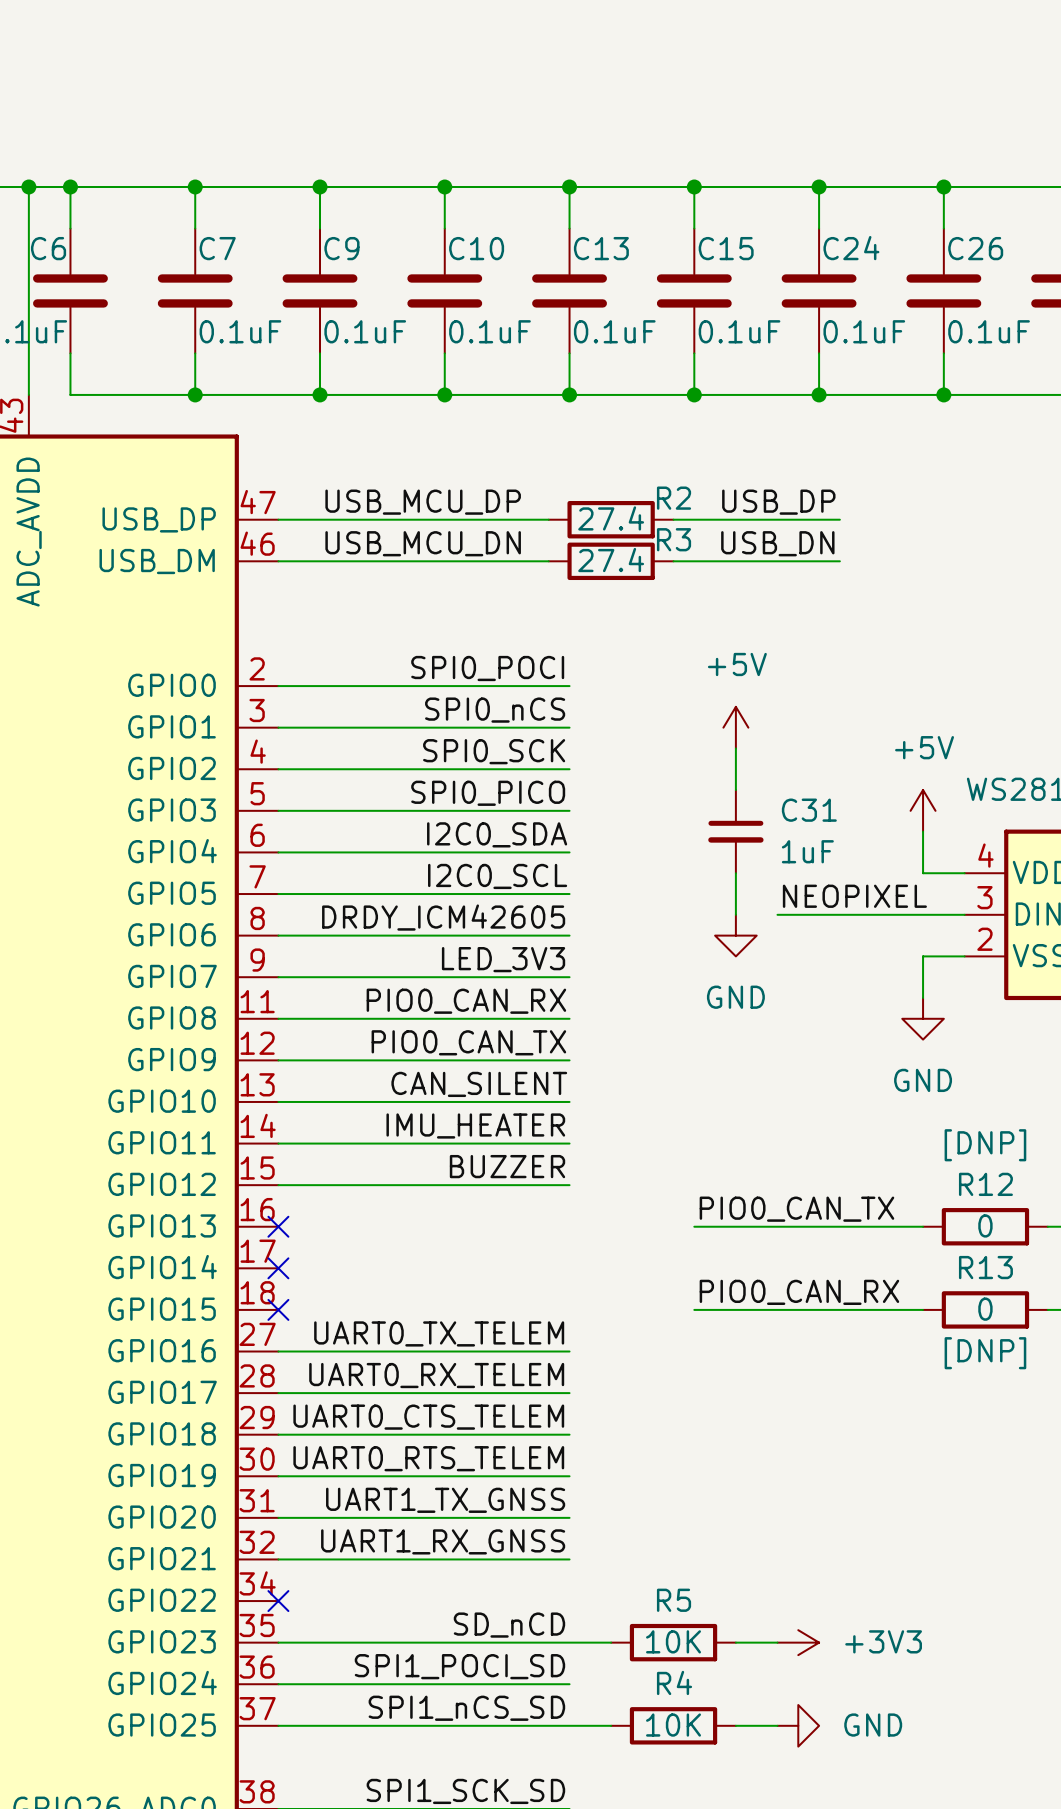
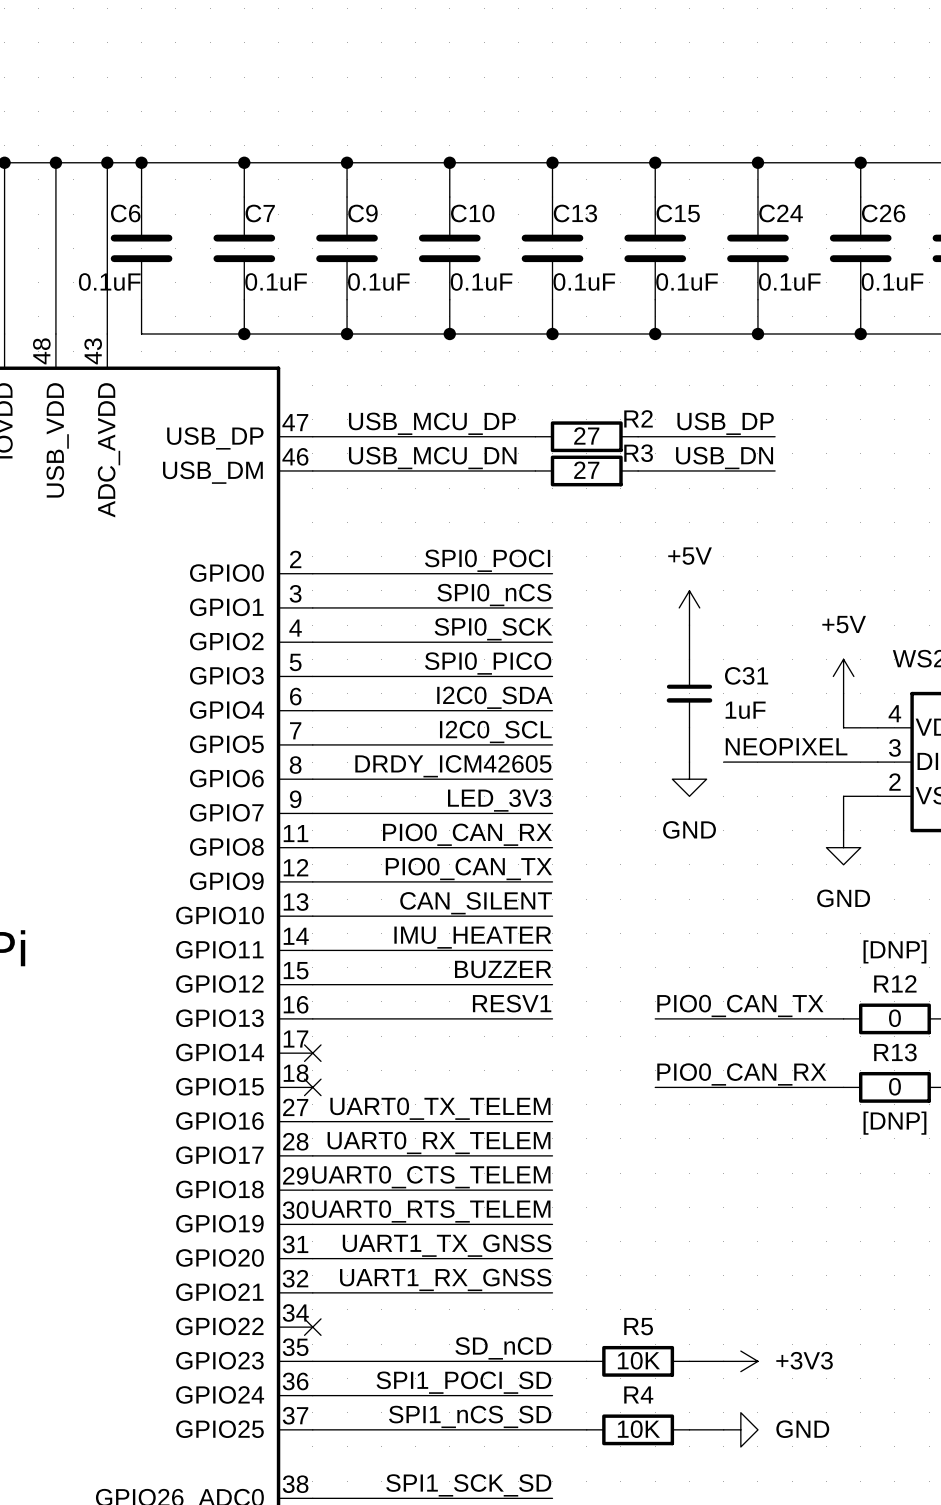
R2 value: 27.4 (611, 518) -> 27 (586, 435)
R3 value: 27.4 (611, 560) -> 27 (586, 470)
label: none -> RESV1 (512, 1003)
wire: none -> (312, 1018) (552, 1018)
no-connect mark: (278, 1226) -> none

